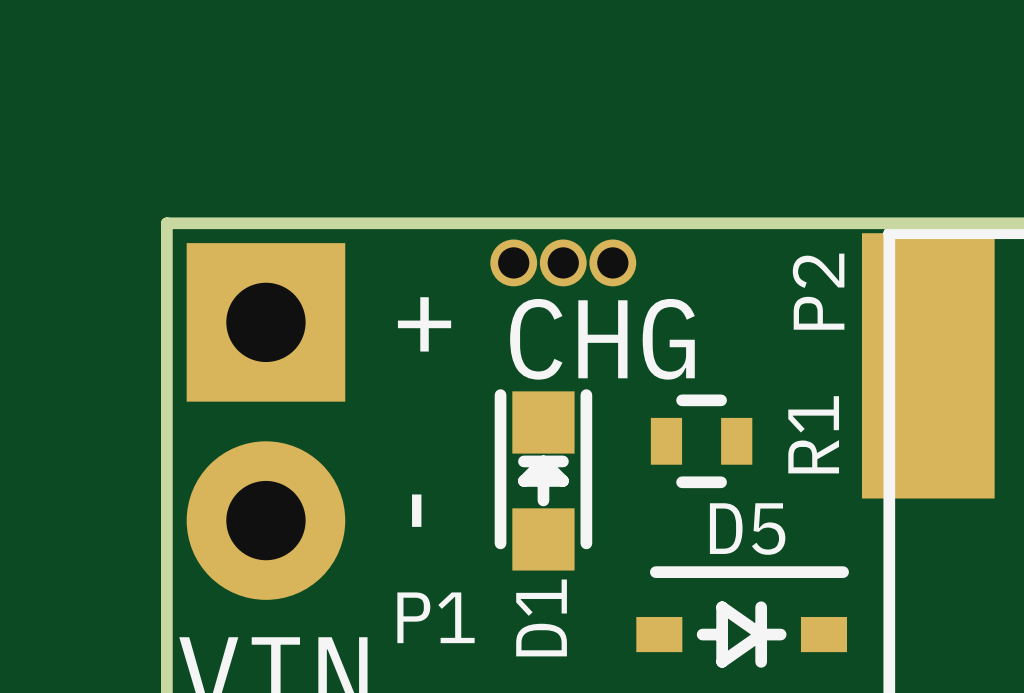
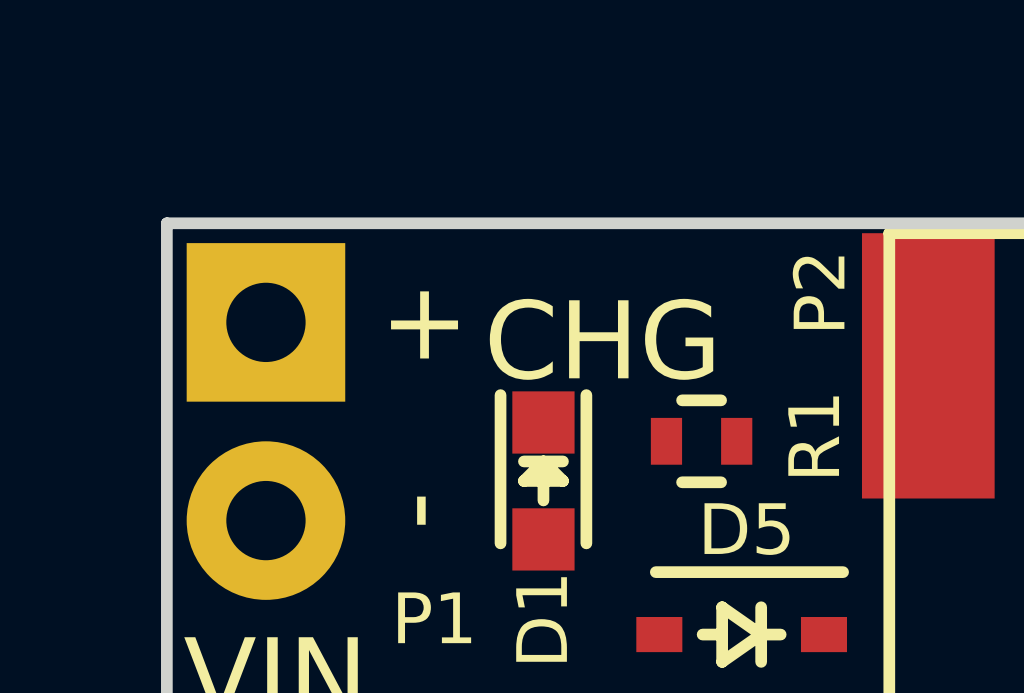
part: (513, 262) -> none
part: (563, 262) -> none
part: (612, 262) -> none

